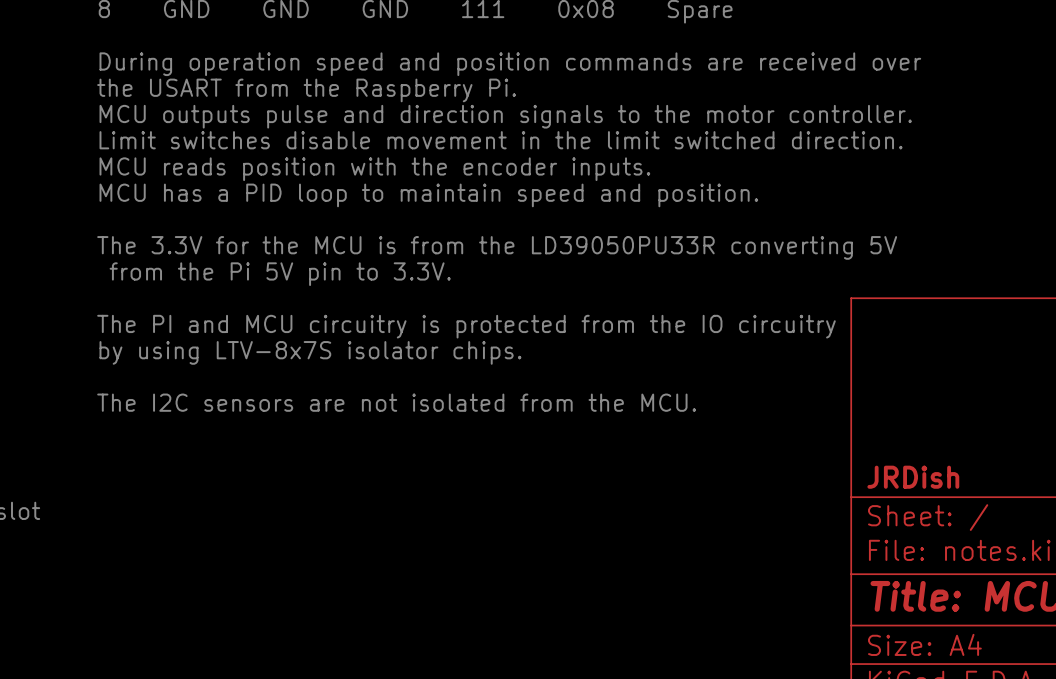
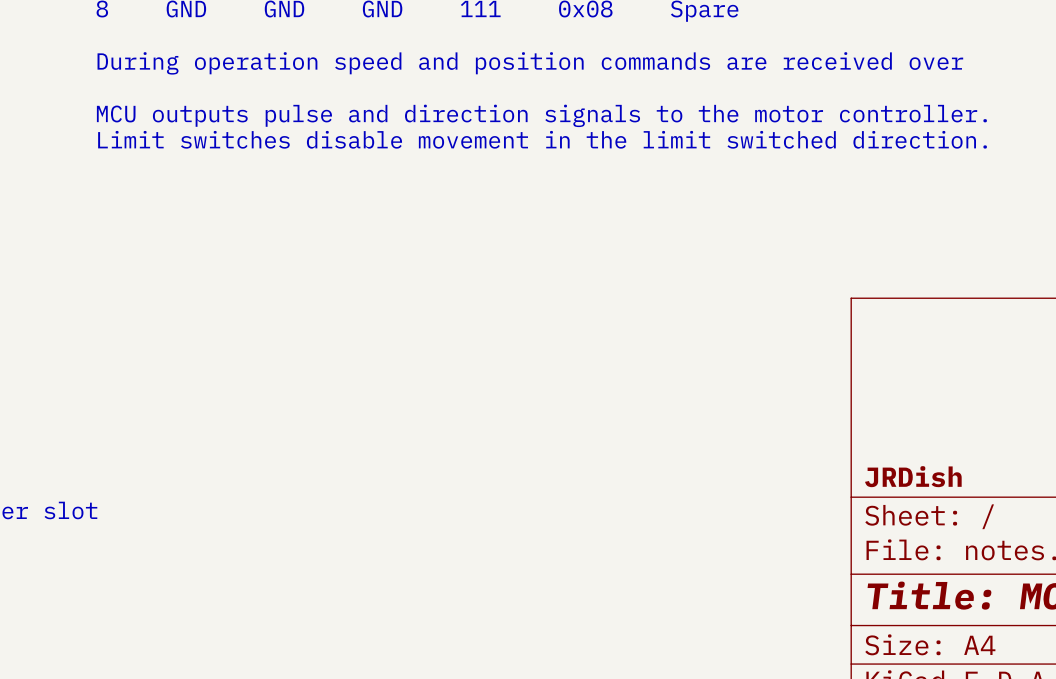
text: the USART from the Raspberry Pi. (306, 90) -> none
text: MCU reads position with the encoder inputs. (374, 169) -> none
text: MCU has a PID loop to maintain speed and position. (428, 195) -> none
text: The 3.3V for the MCU is from the LD39050PU33R converting 5V (497, 247) -> none
text: from the Pi 5V pin to 3.3V. (280, 274) -> none
text: The PI and MCU circuitry is protected from the IO circuitry (466, 326) -> none
text: by using LTV-8x7S isolator chips. (310, 352) -> none
text: The I2C sensors are not isolated from the MCU. (396, 402) -> none

